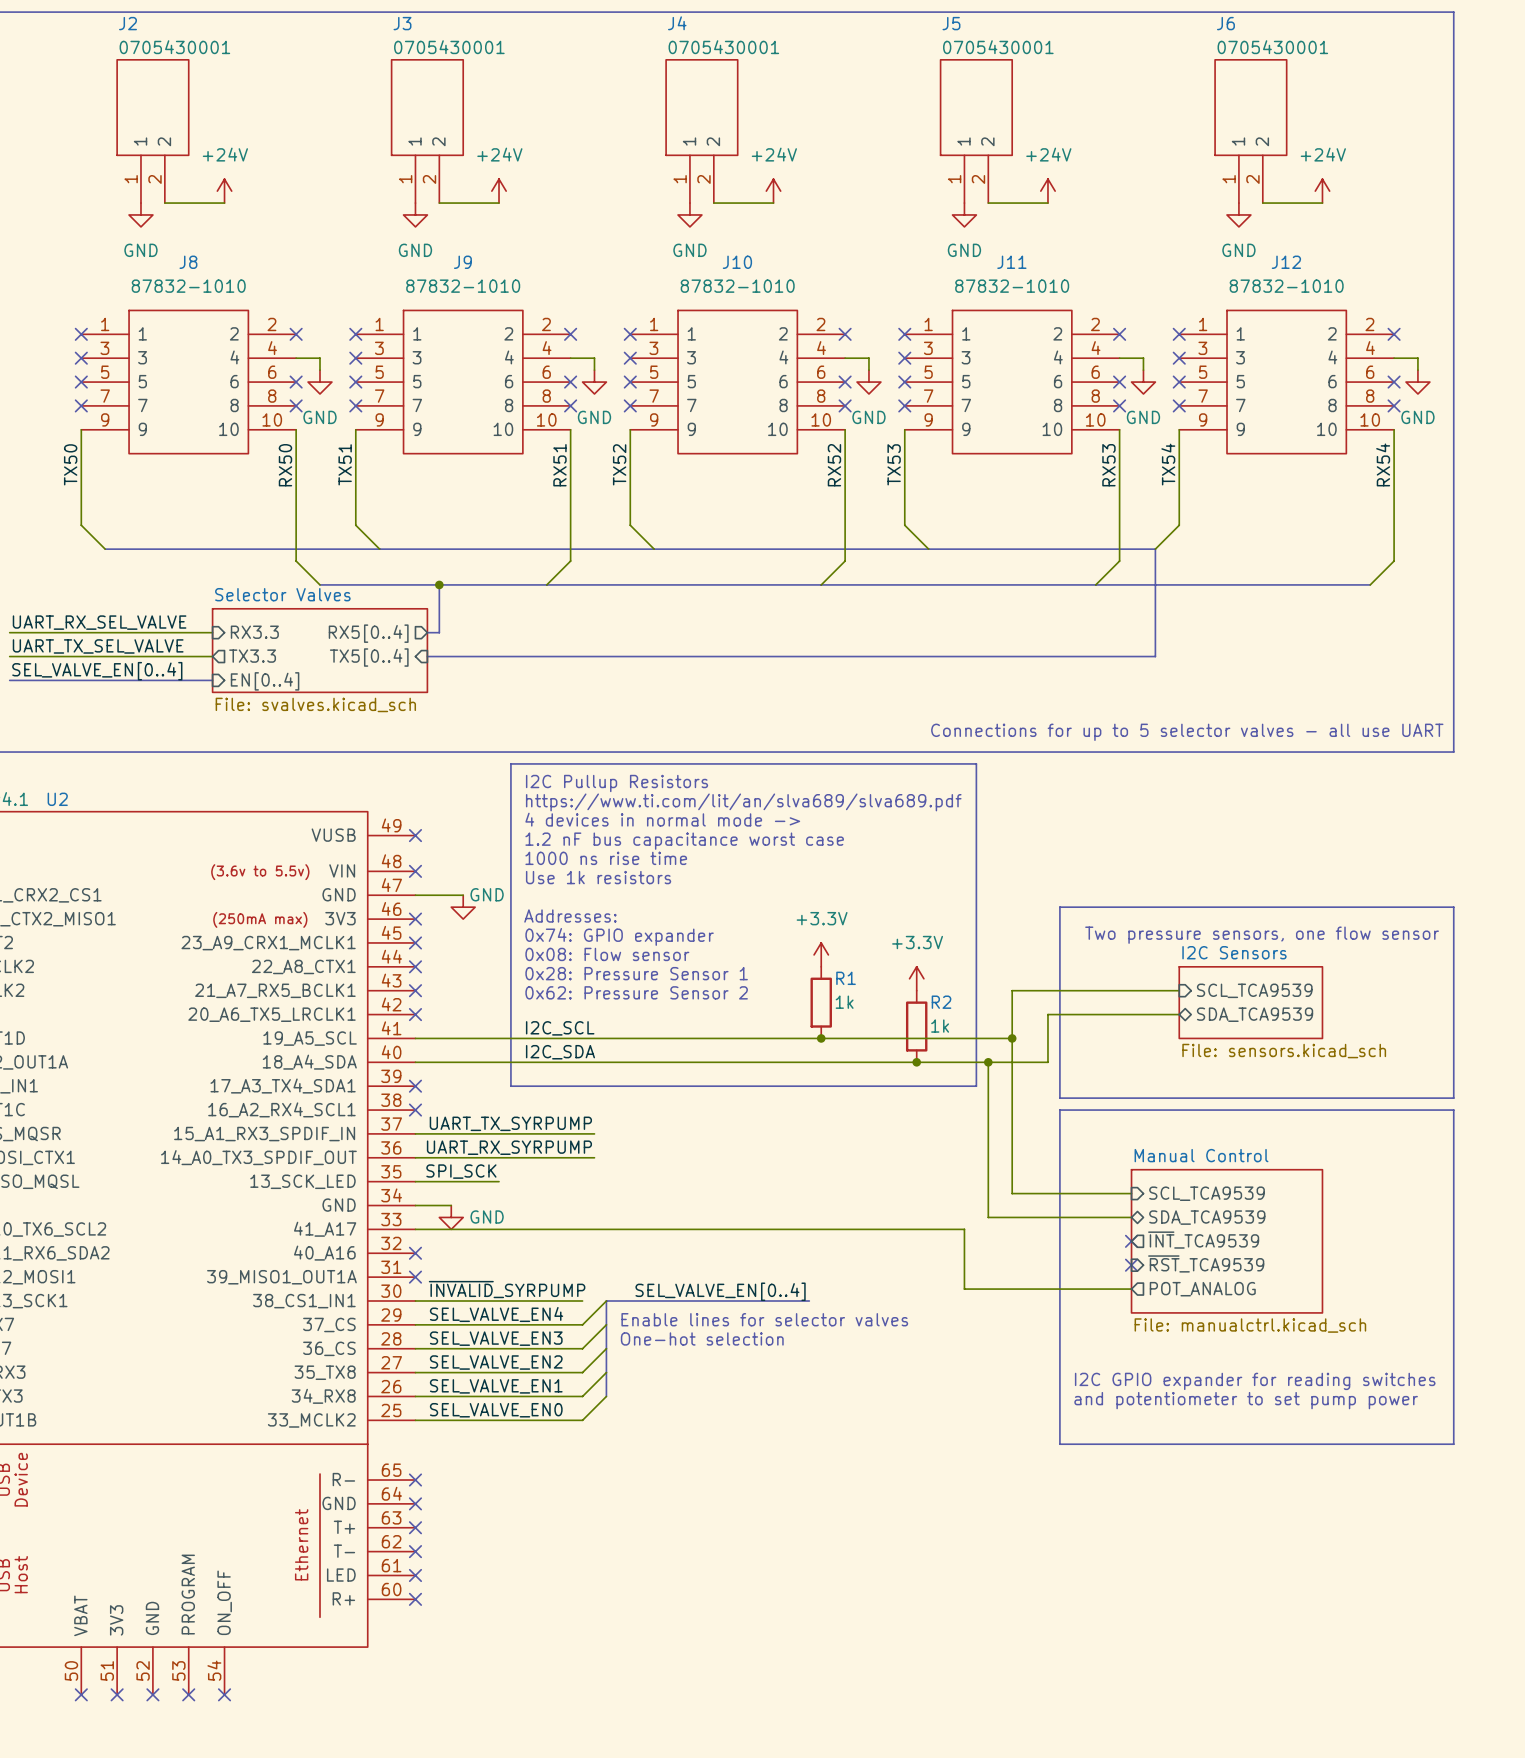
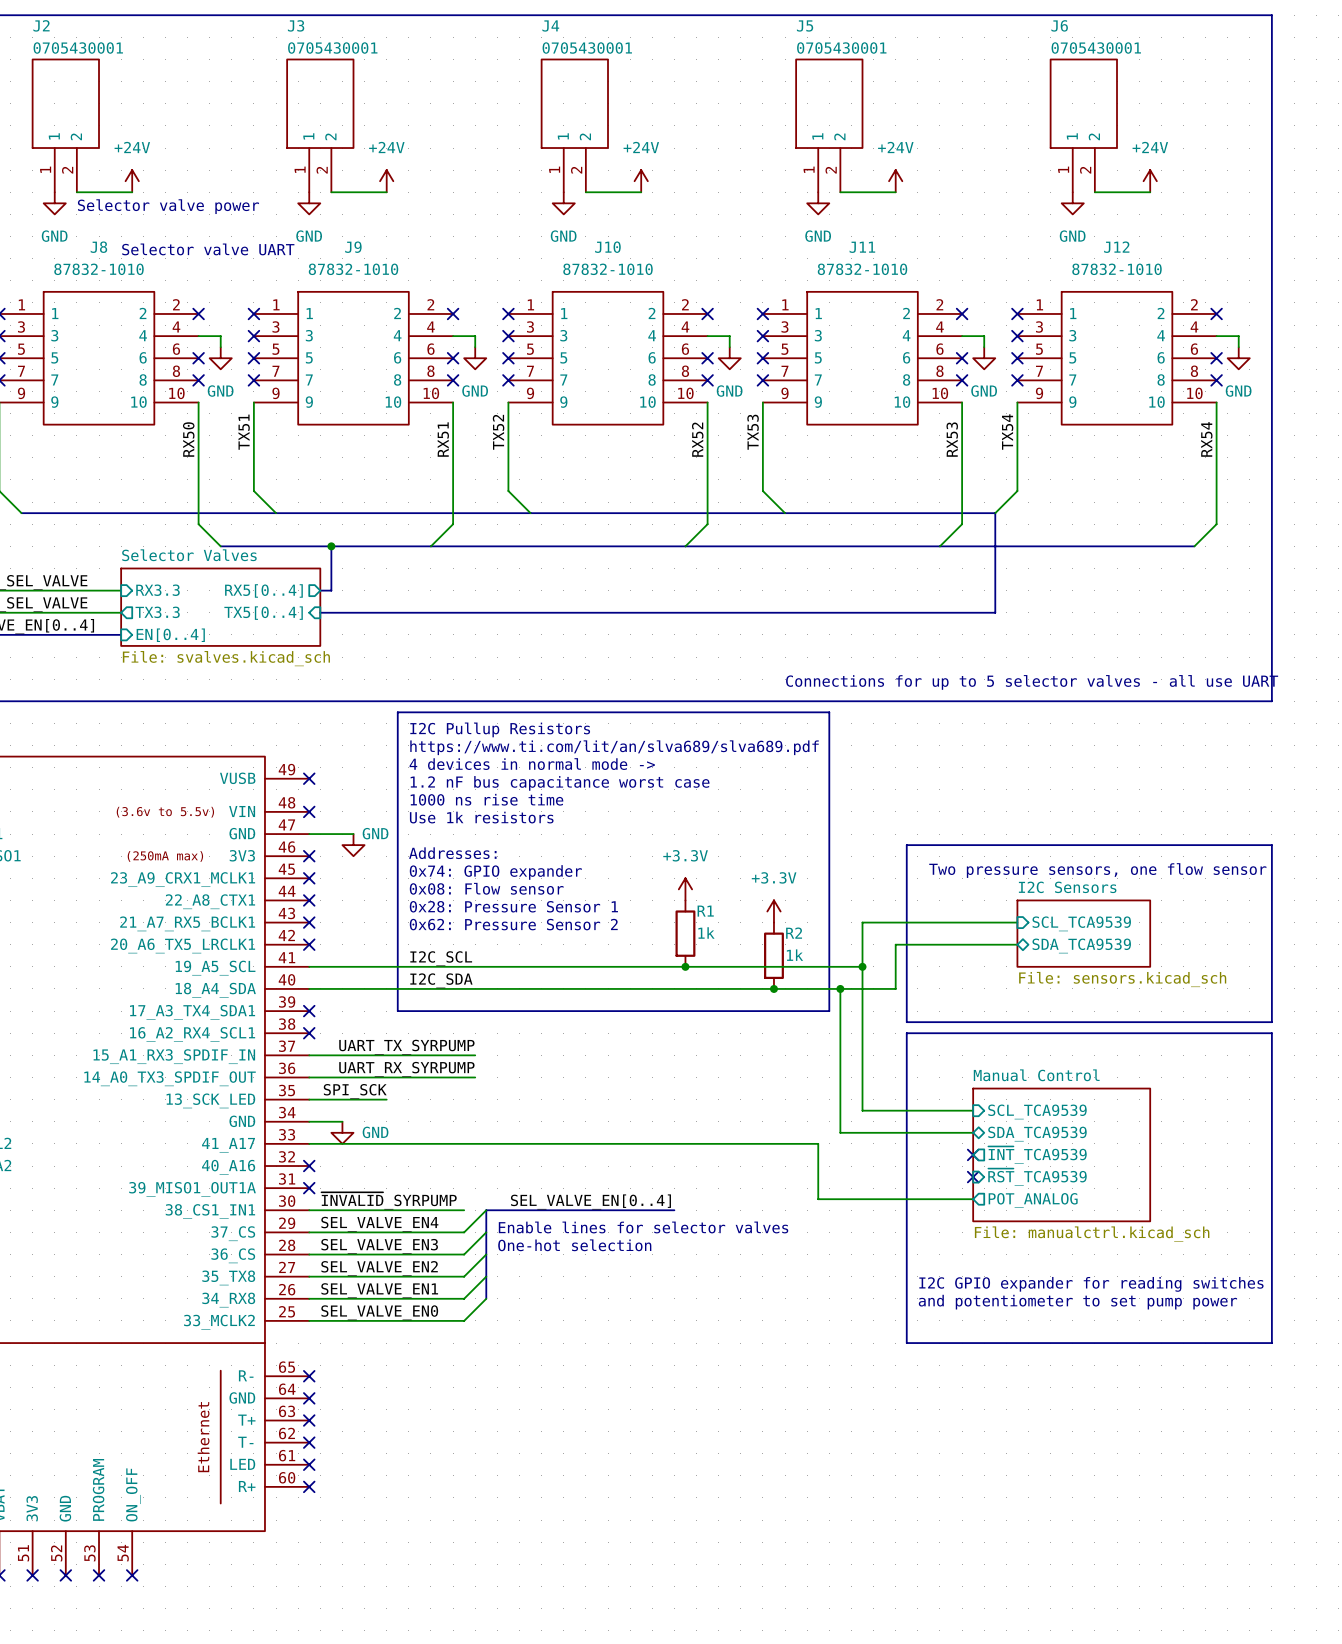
text: none -> Selector valve power (168, 206)
text: none -> Selector valve UART (208, 249)

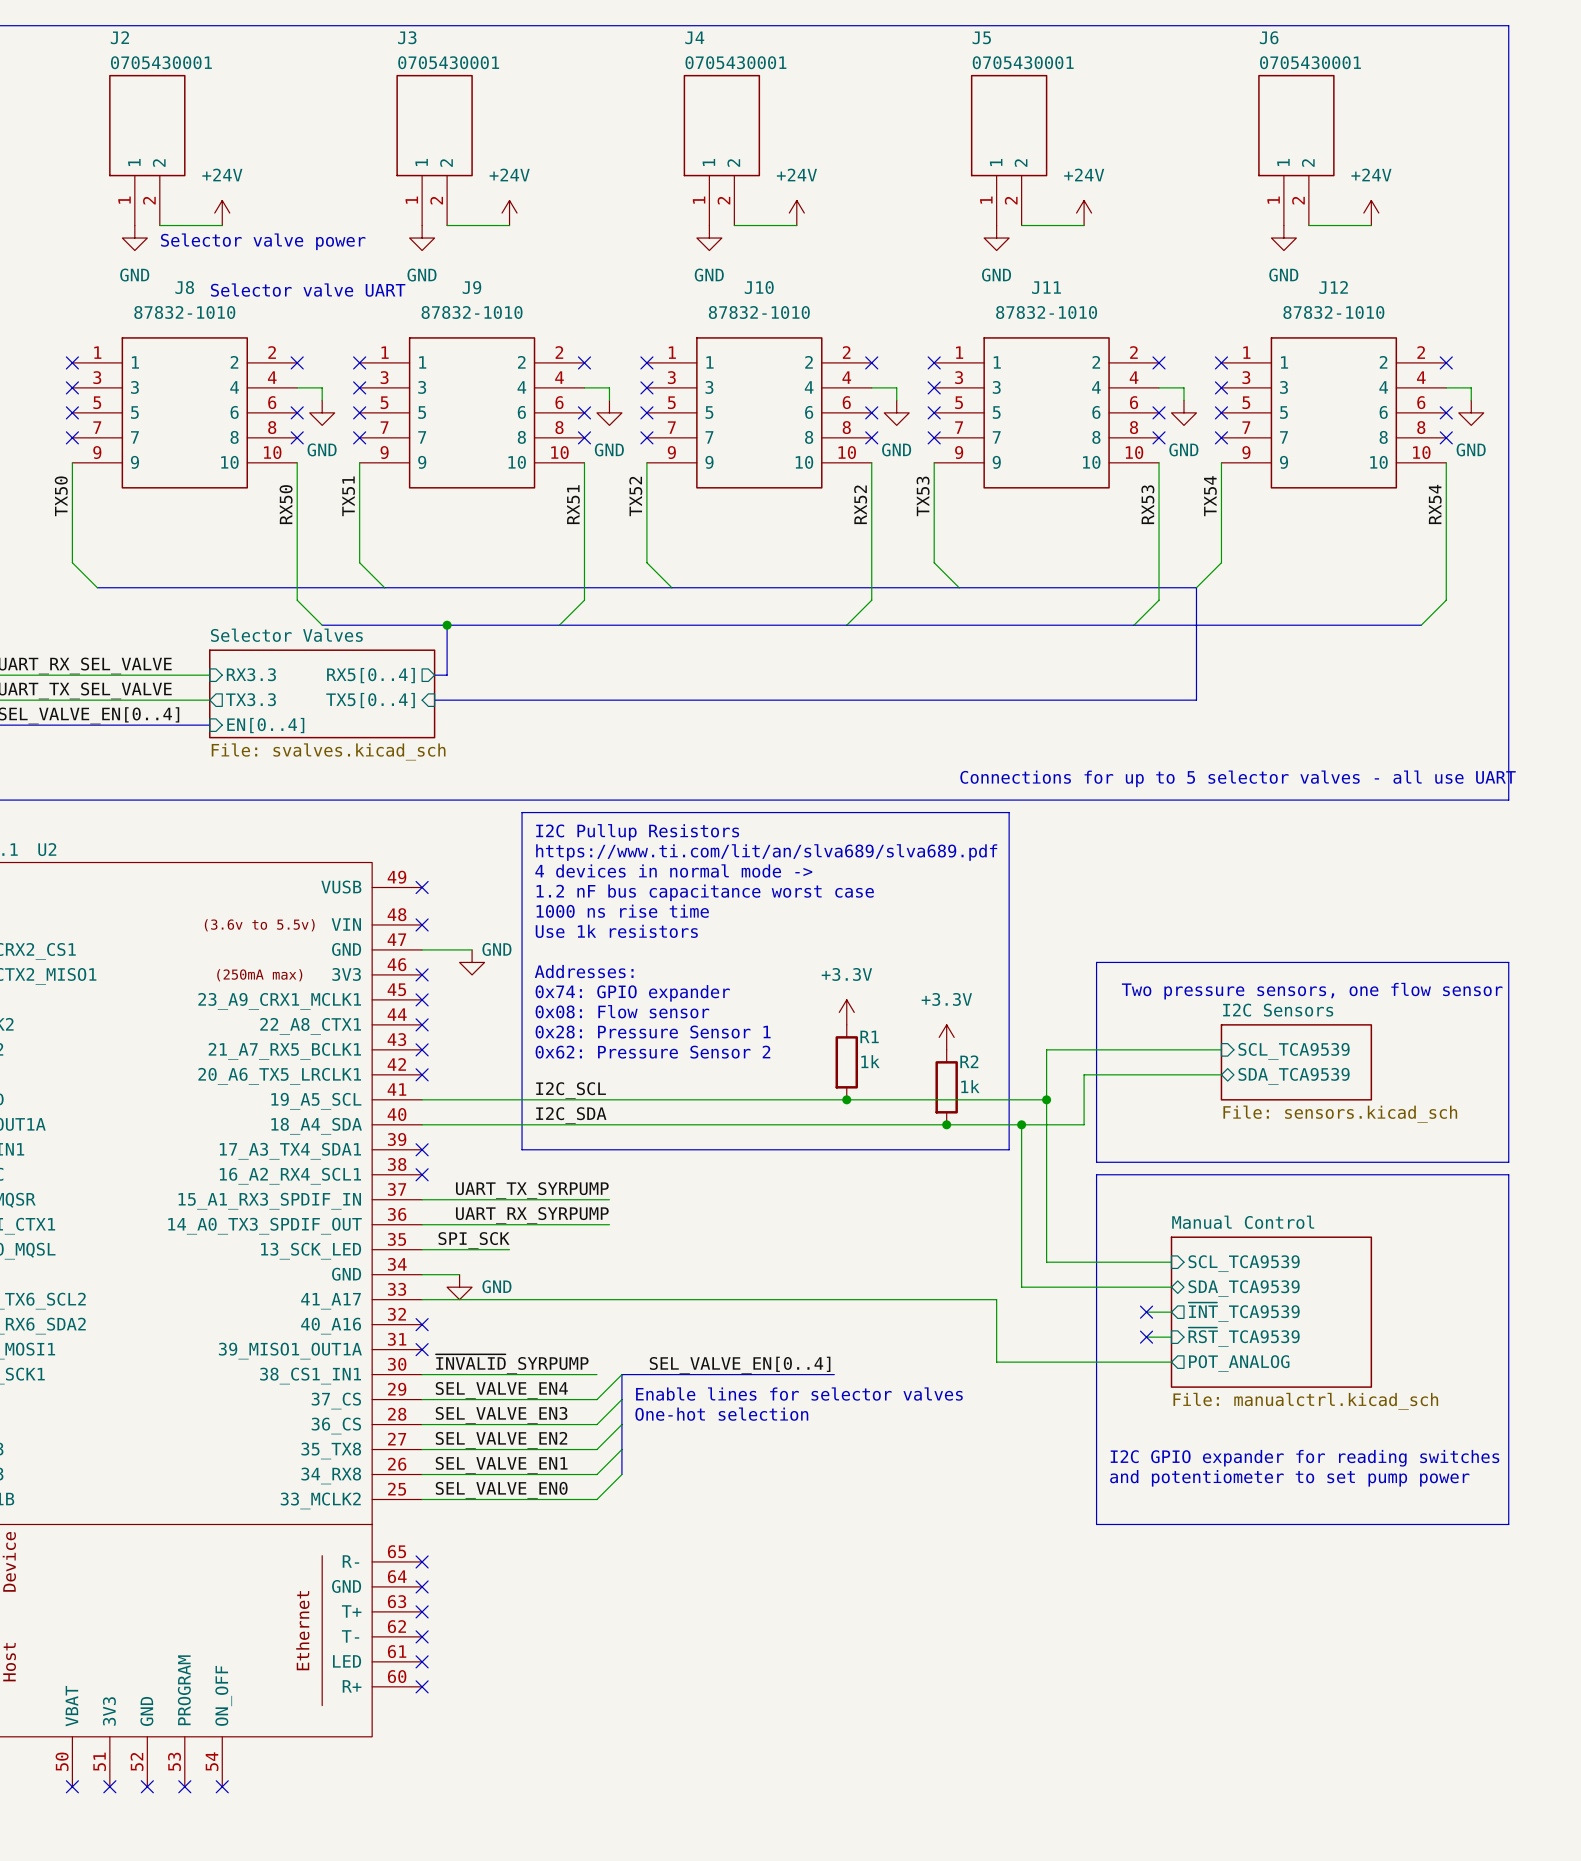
wire: none -> (1146, 1312) (1171, 1312)
no-connect mark: none -> (1146, 1312)
no-connect mark: (973, 1154) -> none
wire: none -> (1146, 1337) (1171, 1337)
no-connect mark: none -> (1146, 1337)
no-connect mark: (973, 1177) -> none

